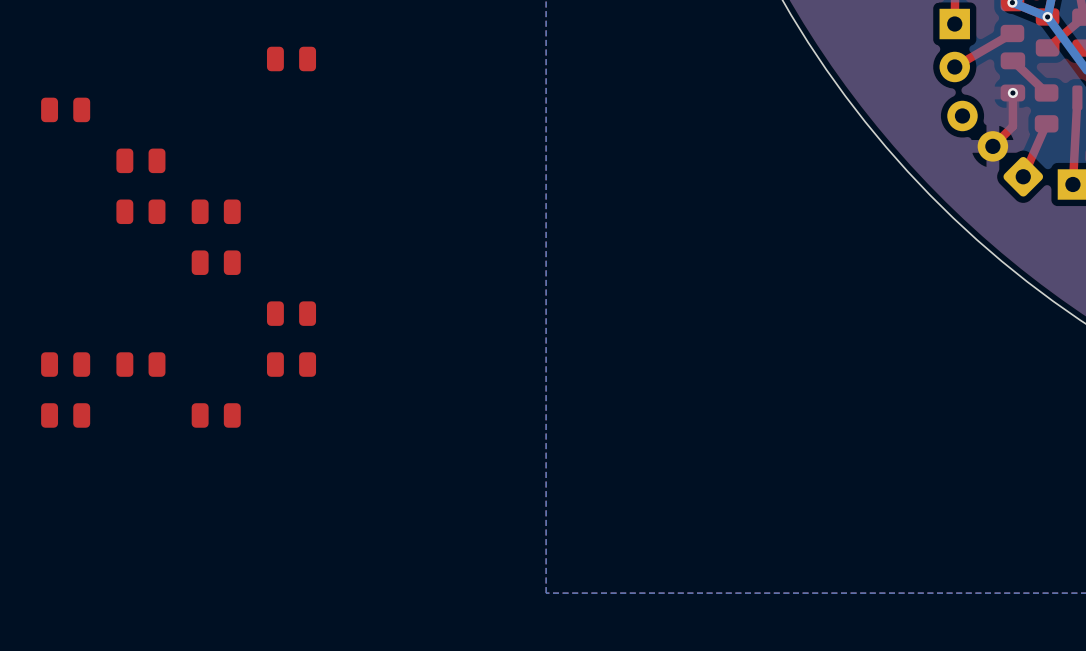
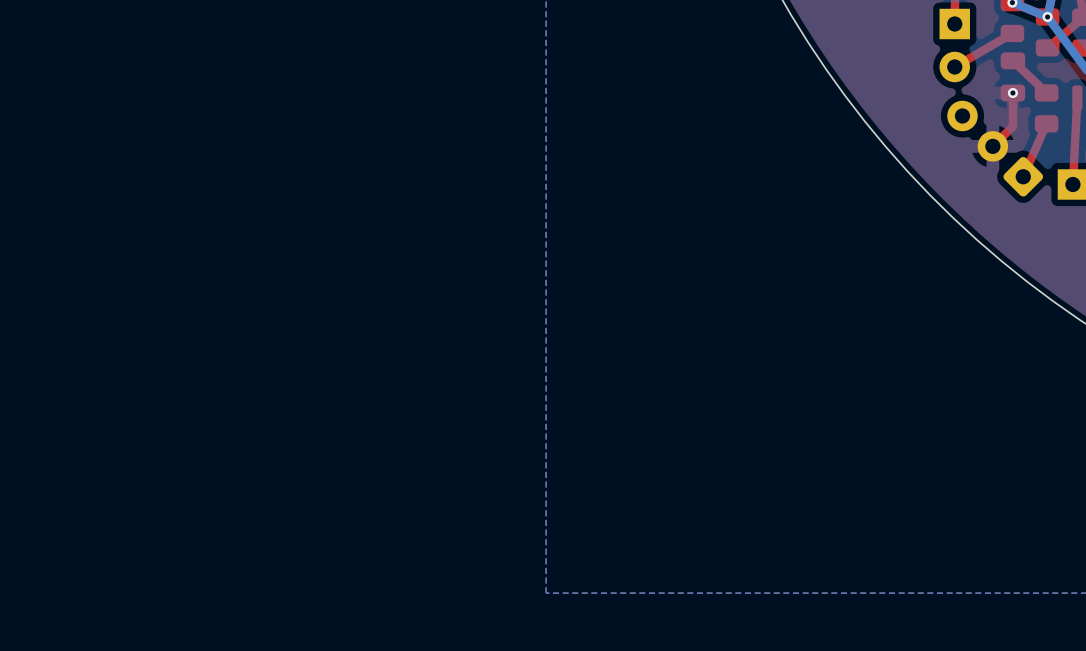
part: (291, 58) -> none
part: (65, 109) -> none
part: (140, 160) -> none
part: (140, 211) -> none
part: (216, 211) -> none
part: (216, 262) -> none
part: (291, 313) -> none
part: (65, 364) -> none
part: (140, 364) -> none
part: (291, 364) -> none
part: (65, 415) -> none
part: (216, 415) -> none

